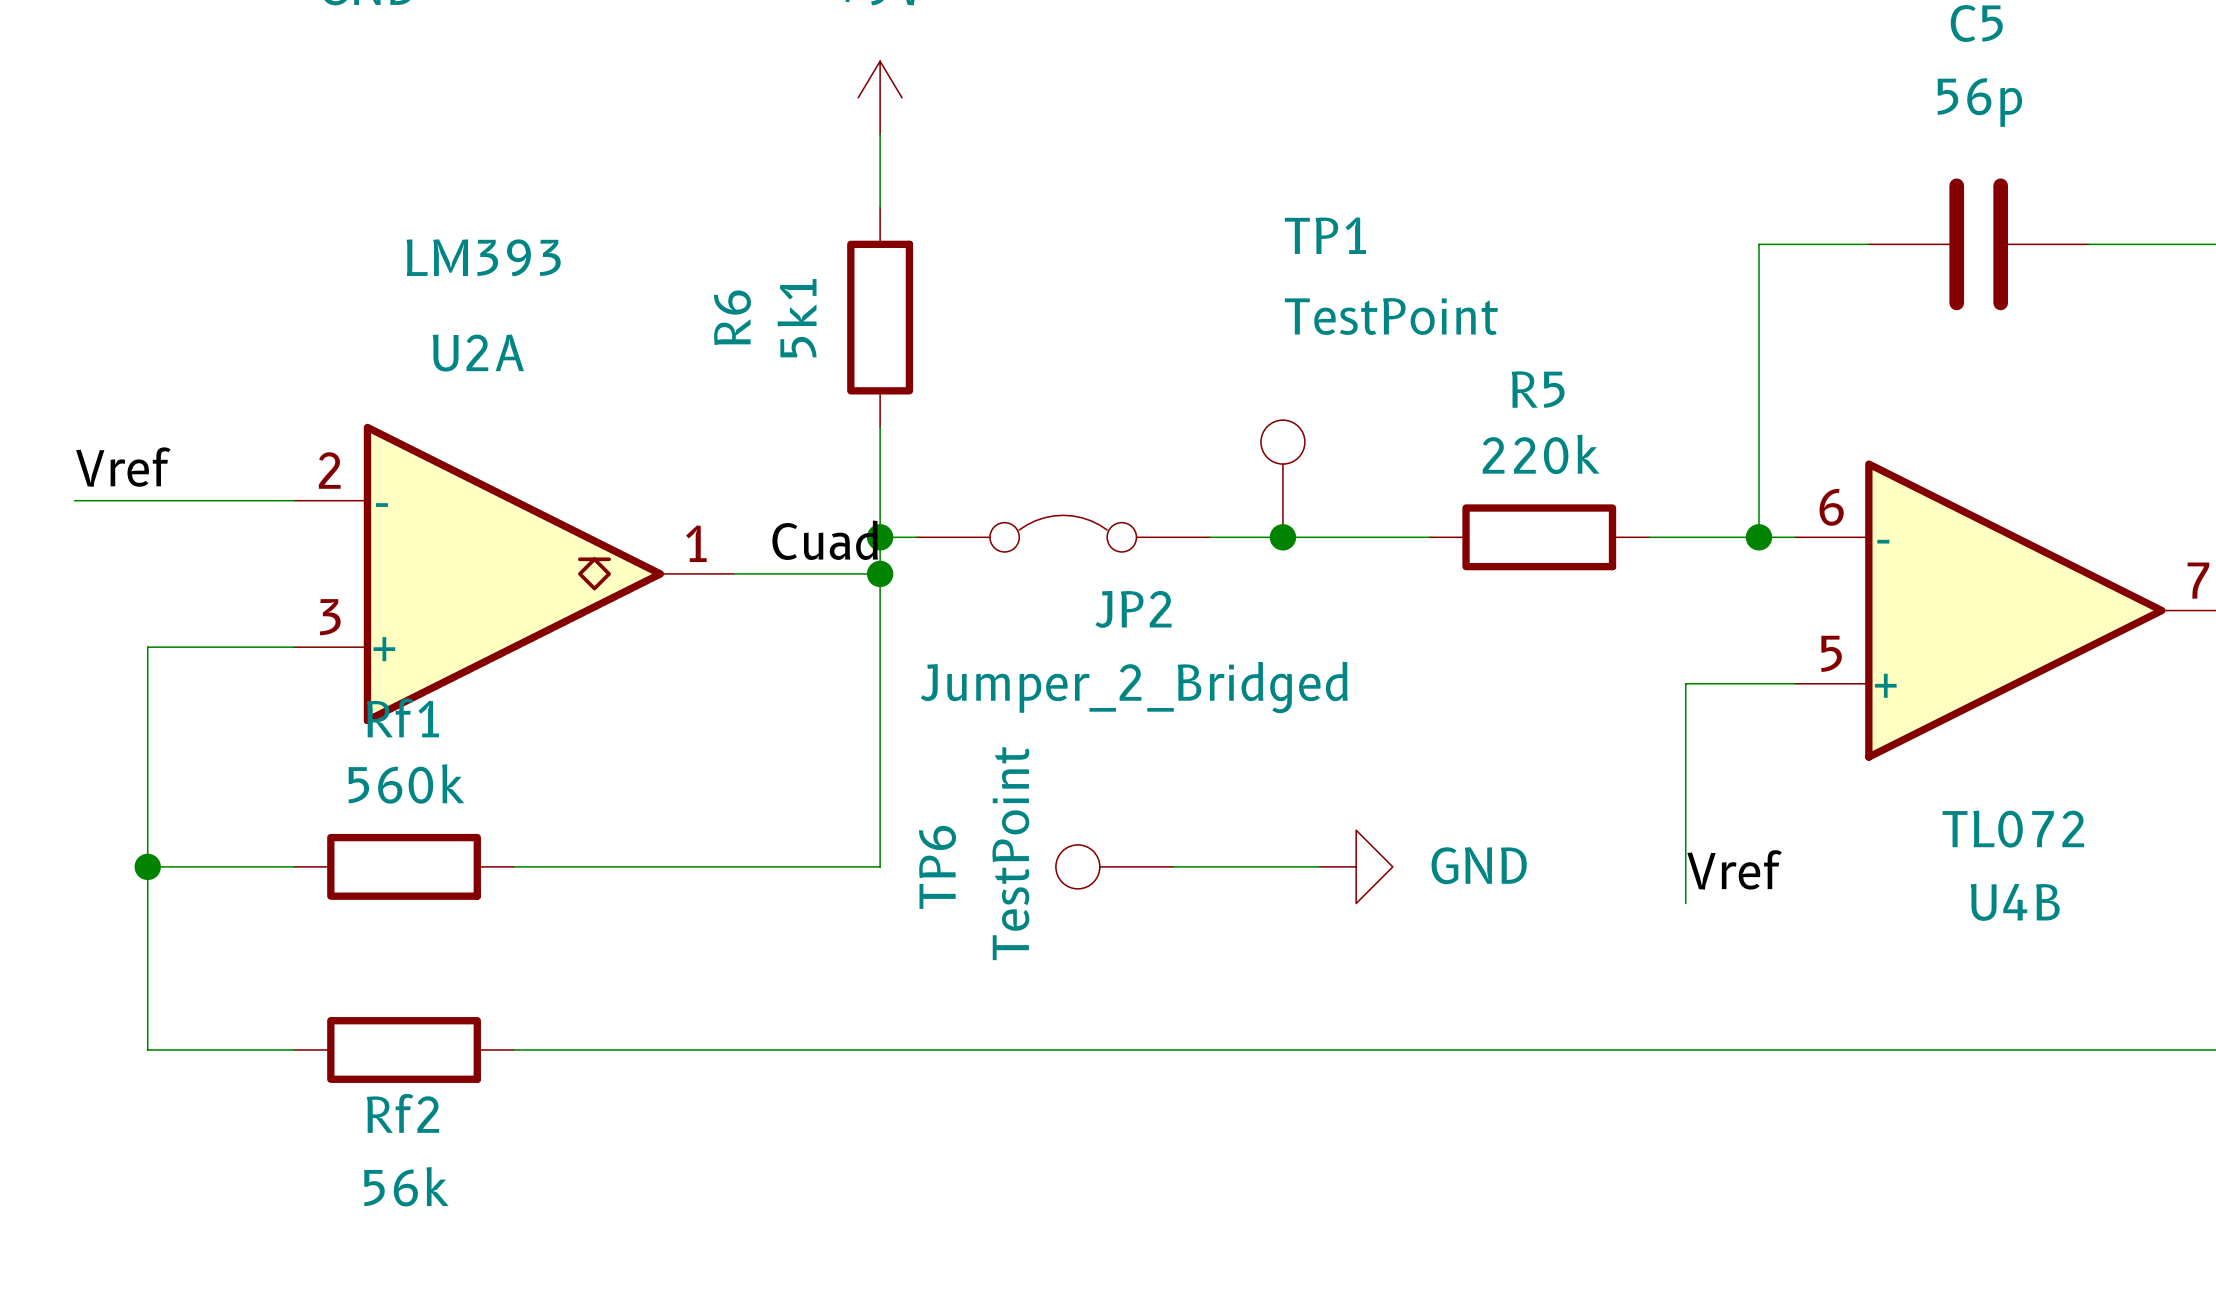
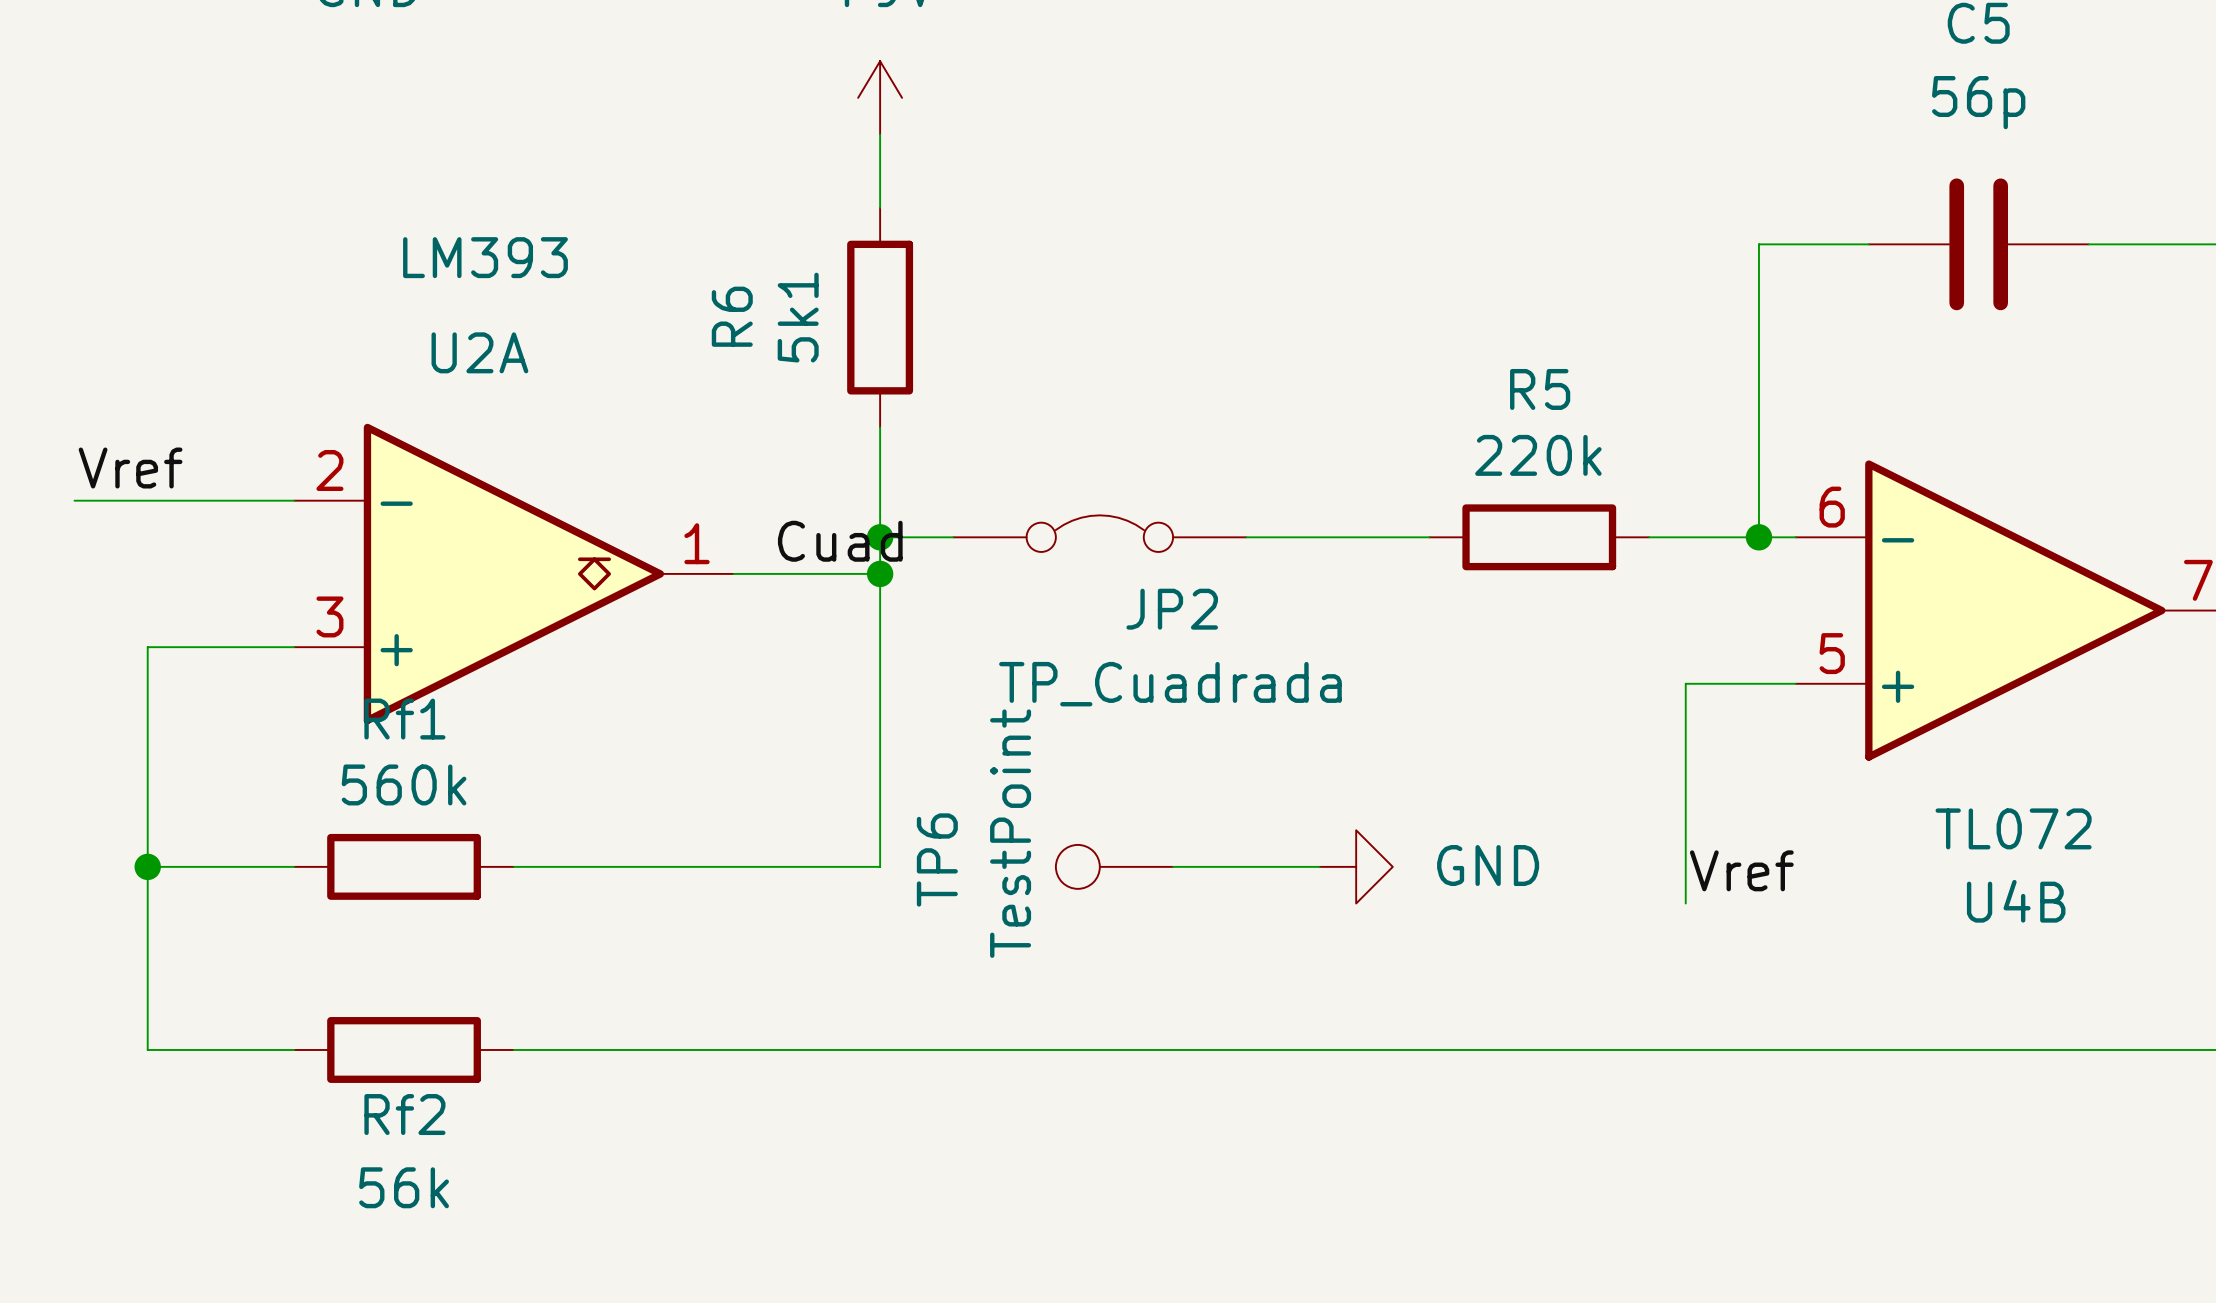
TP1: TestPoint (1282, 478) -> none
JP2 position: (1063, 533) -> (1099, 533)
junction: (1282, 537) -> none
JP2 value: Jumper_2_Bridged (1134, 687) -> TP_Cuadrada (1170, 684)

